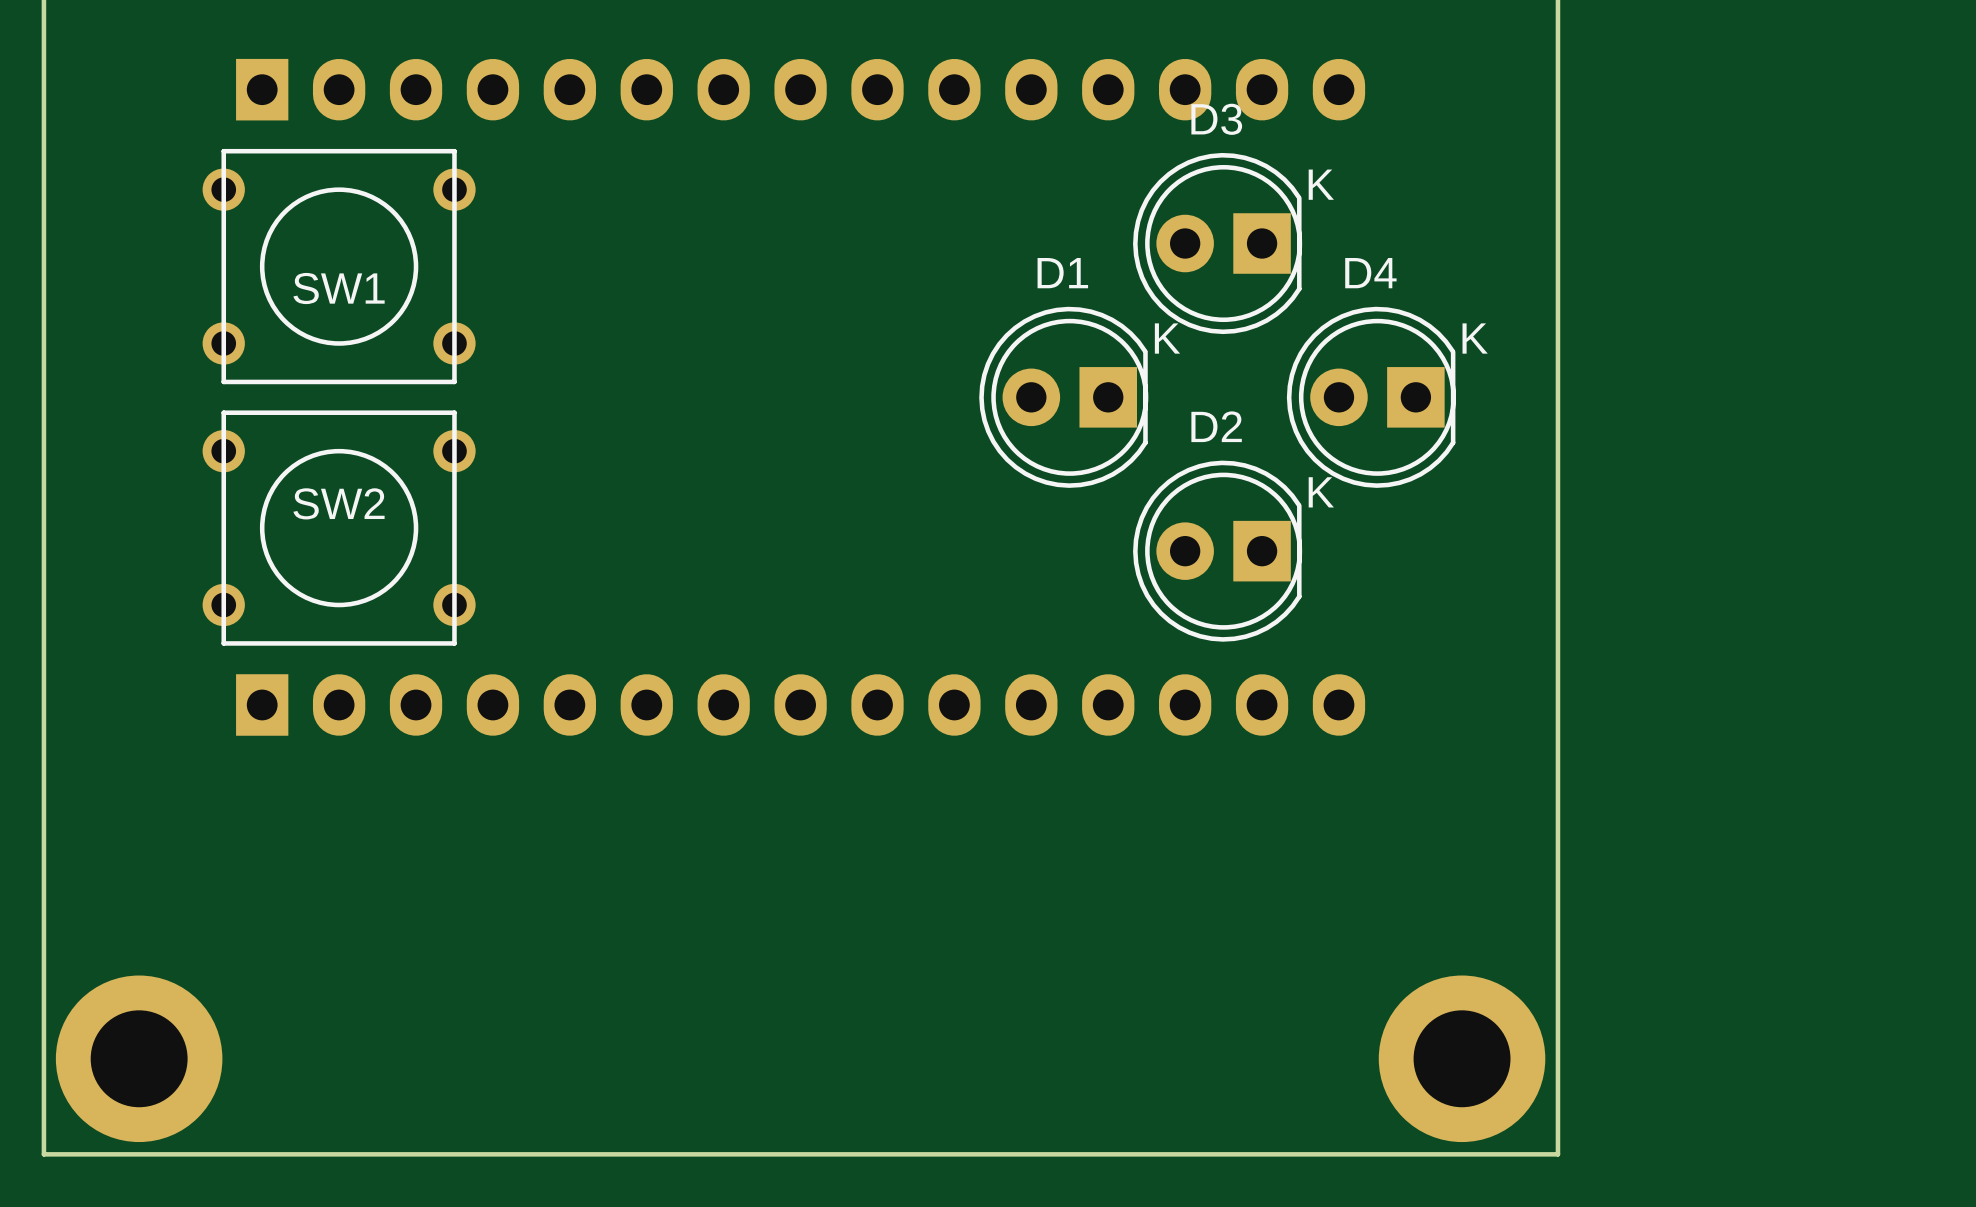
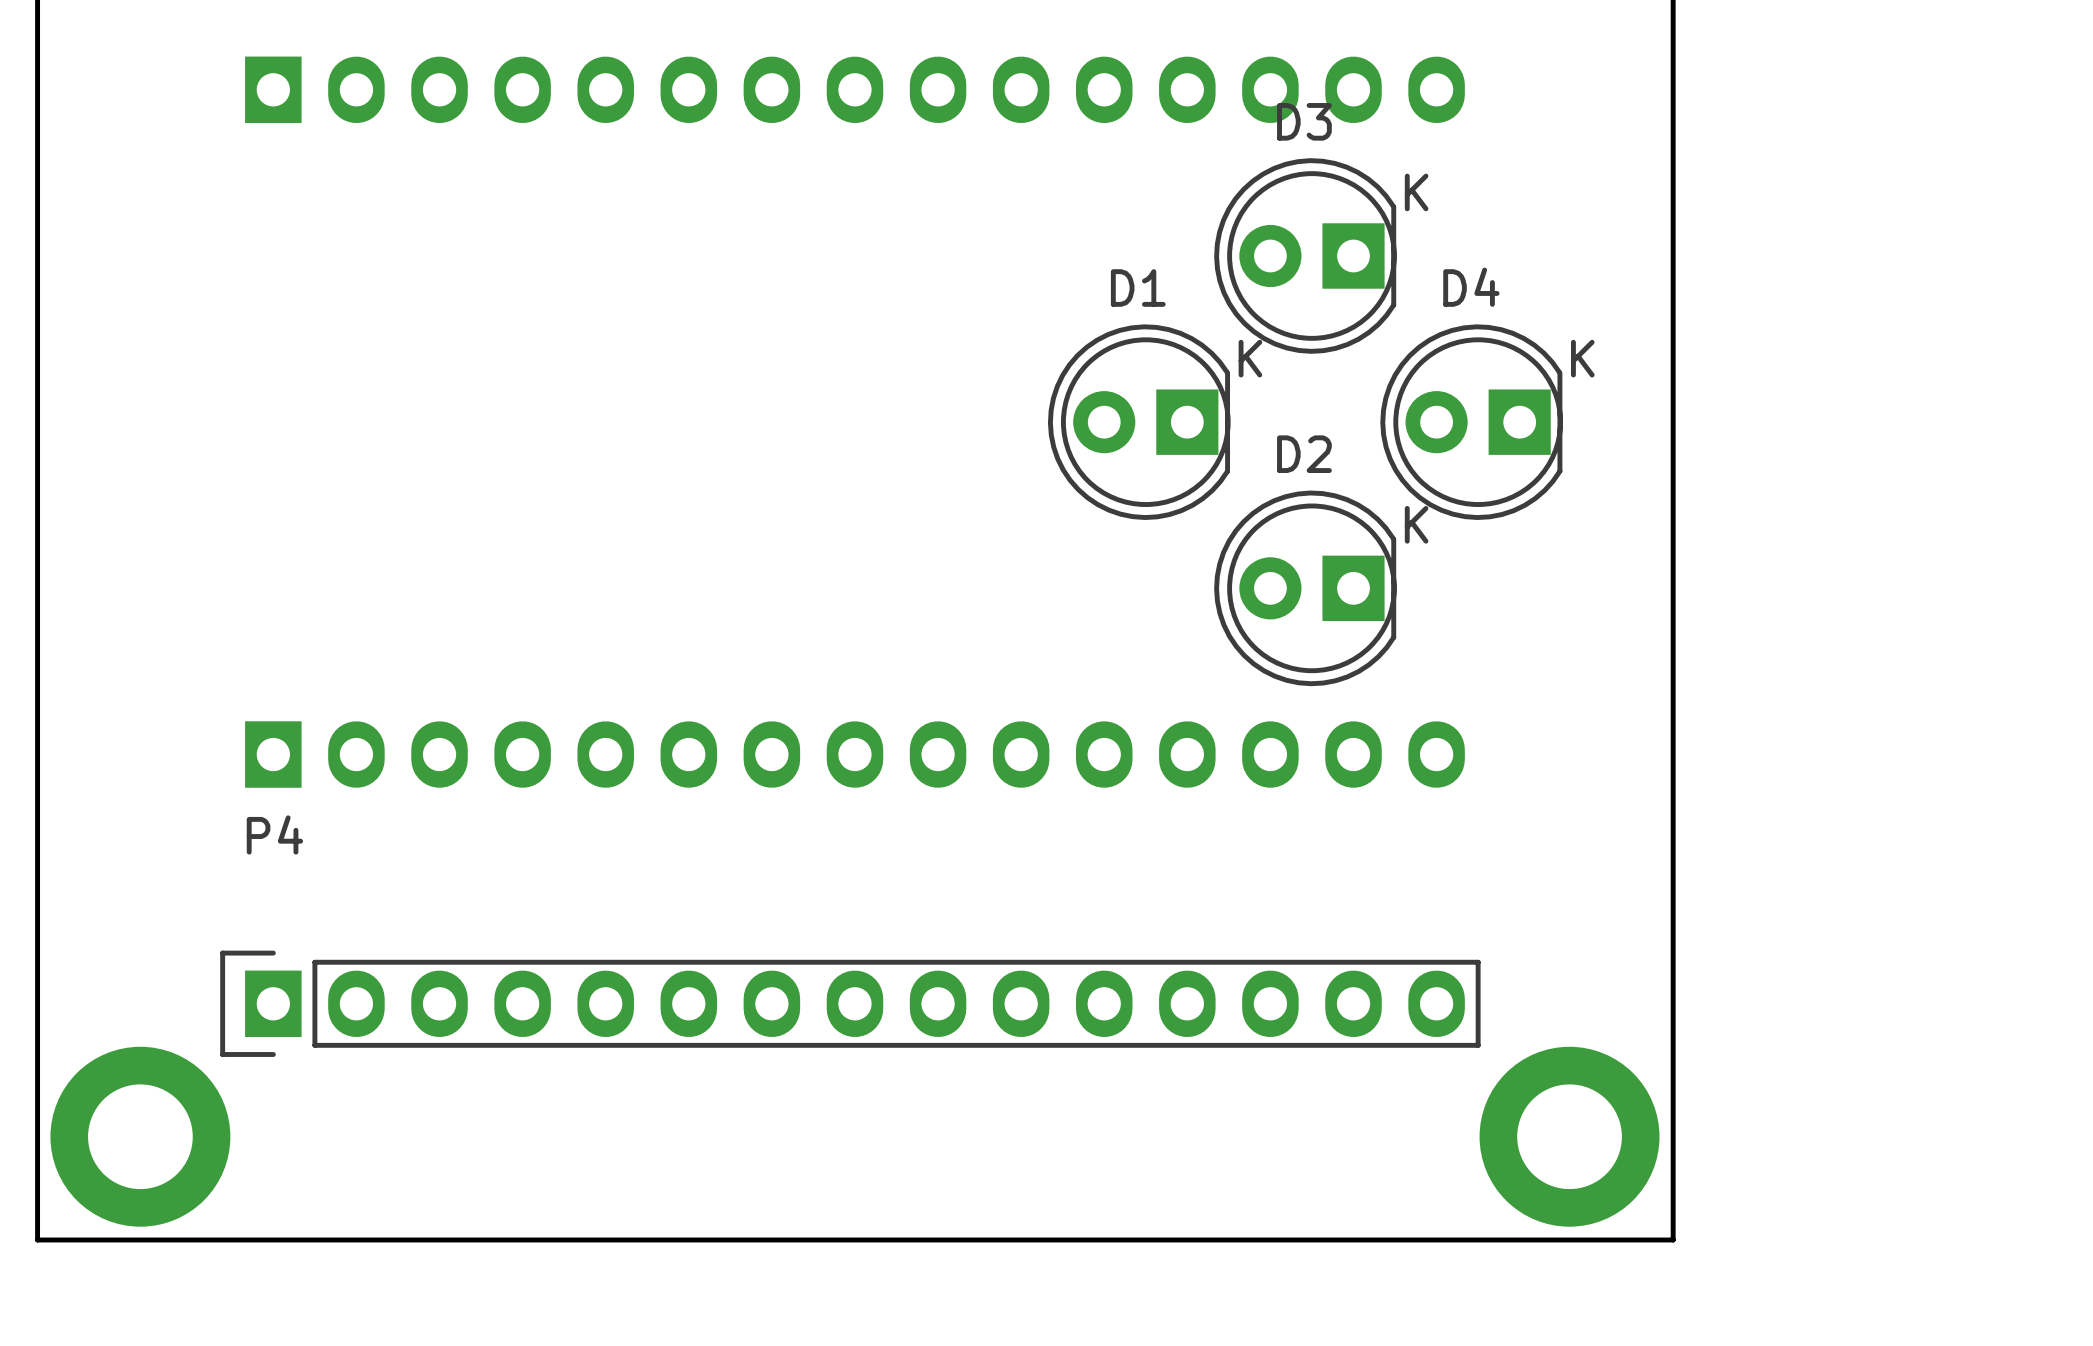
SW1: (339, 266) -> none
SW2: (339, 528) -> none
P4: none -> (850, 1003)

